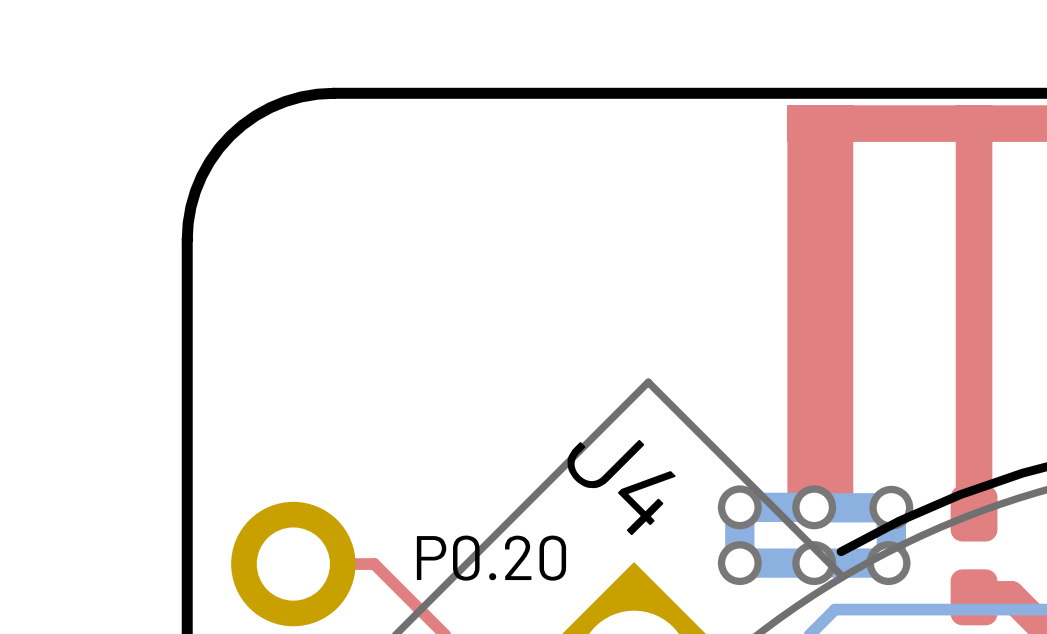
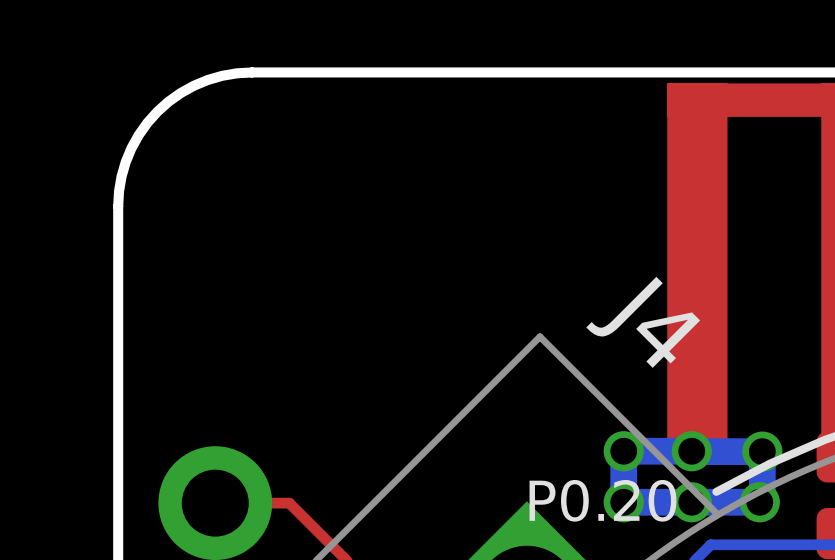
J4 name position: J4 (621, 487) -> J4 (643, 322)
text position: P0.20 (491, 558) -> P0.20 (602, 500)

